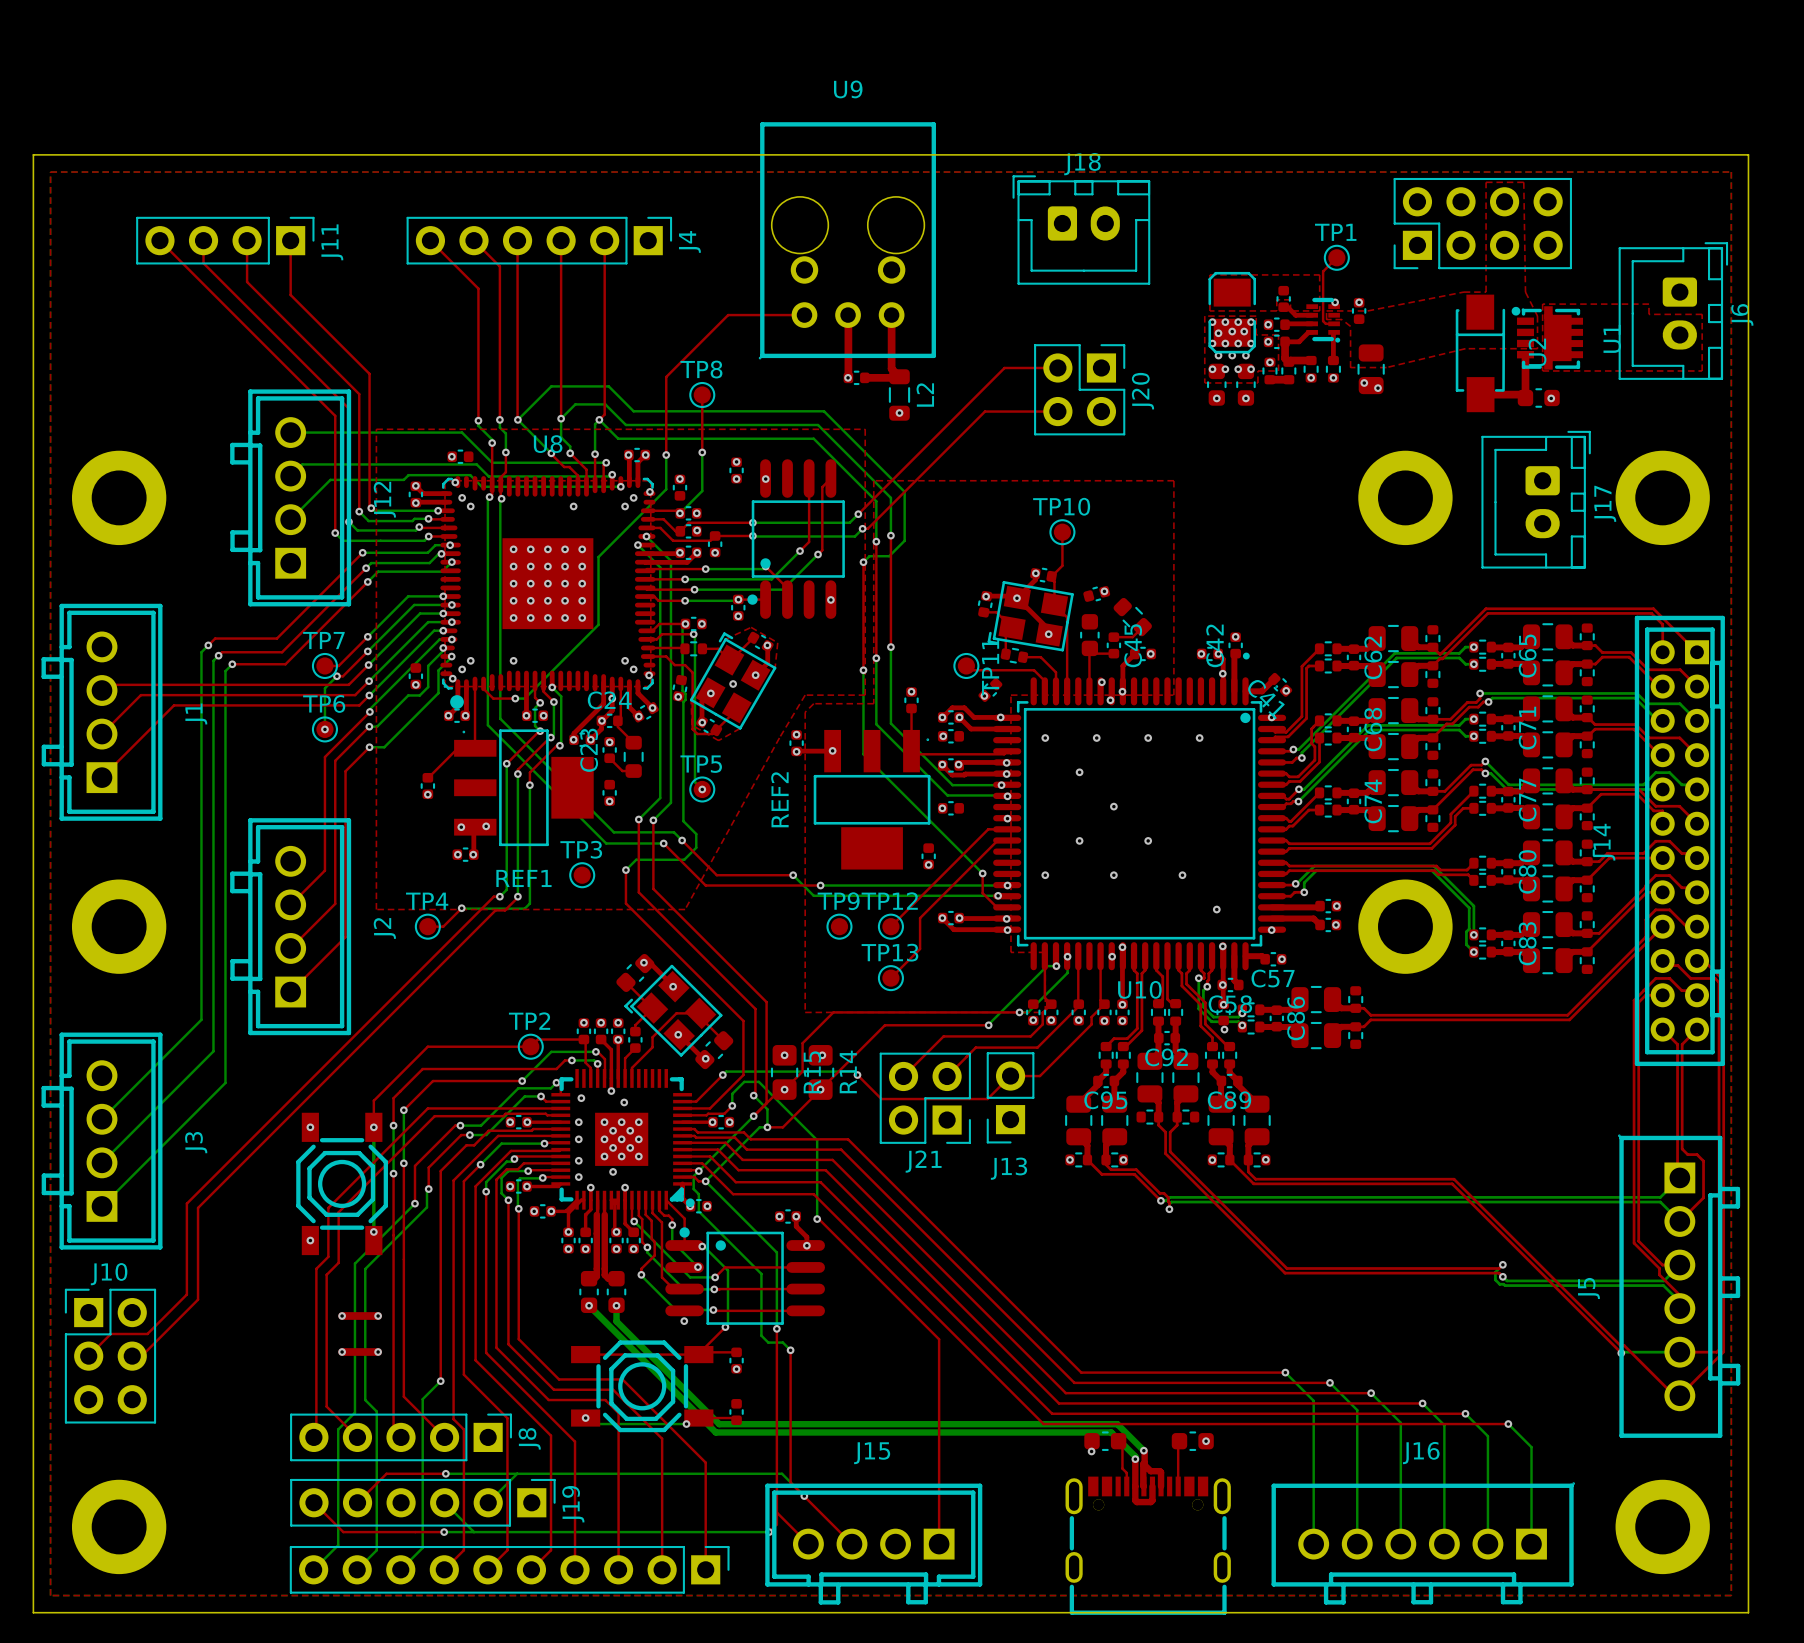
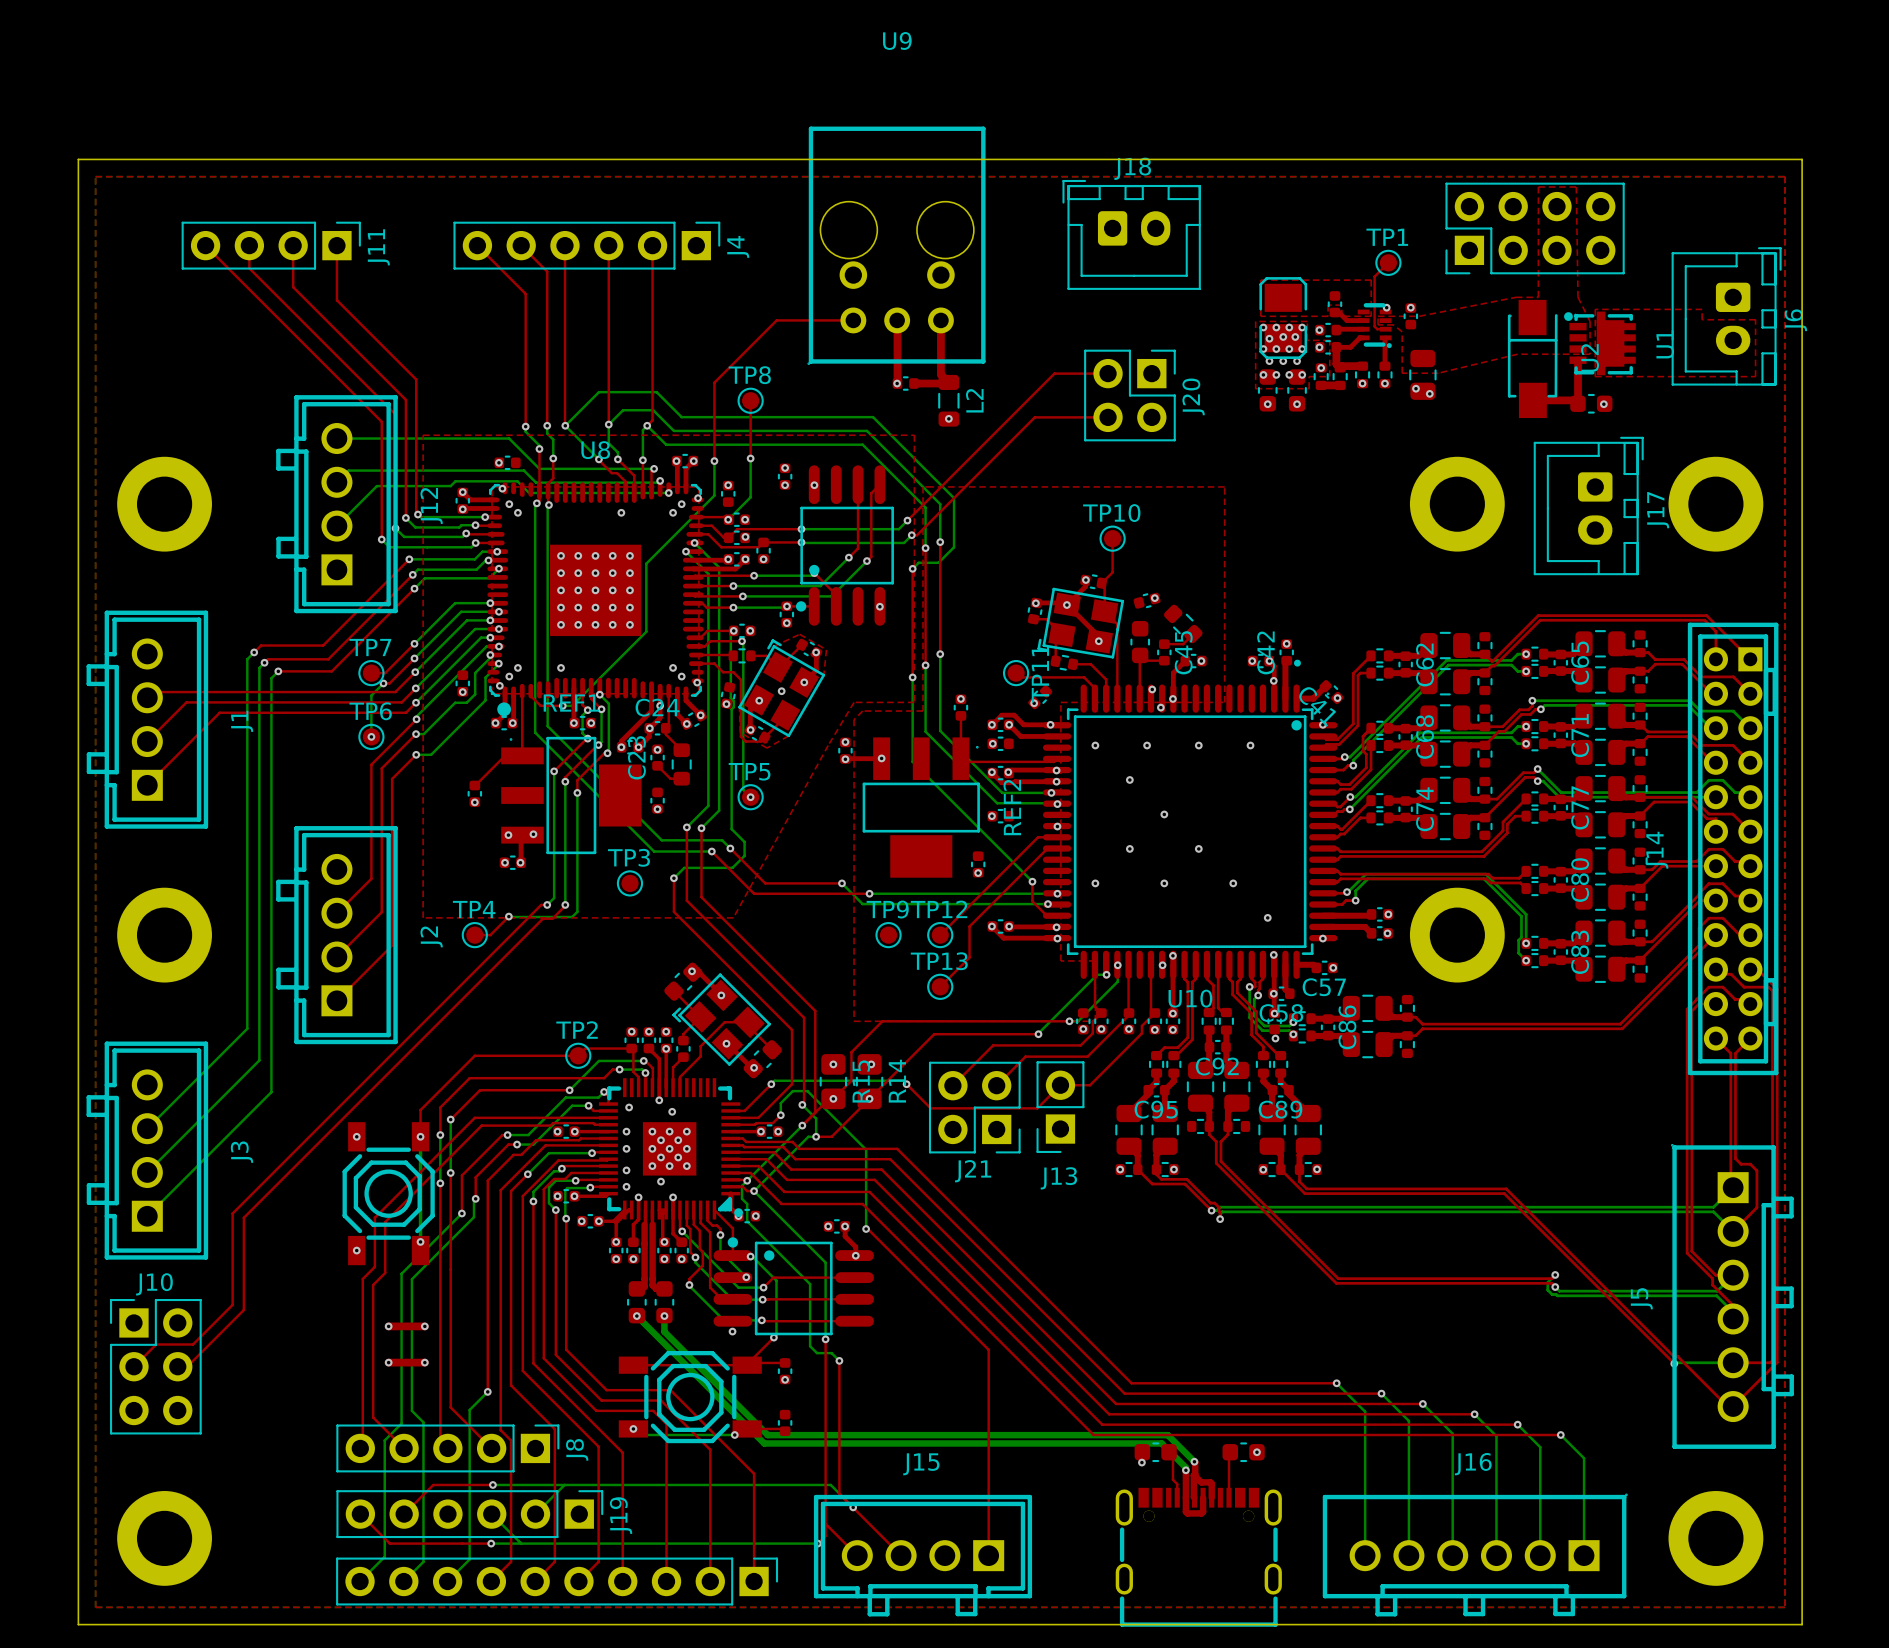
U9 name position: U9 (848, 89) -> U9 (897, 40)
REF2 name position: REF2 (779, 799) -> REF2 (1012, 807)
REF1 name position: REF1 (523, 878) -> REF1 (571, 703)

